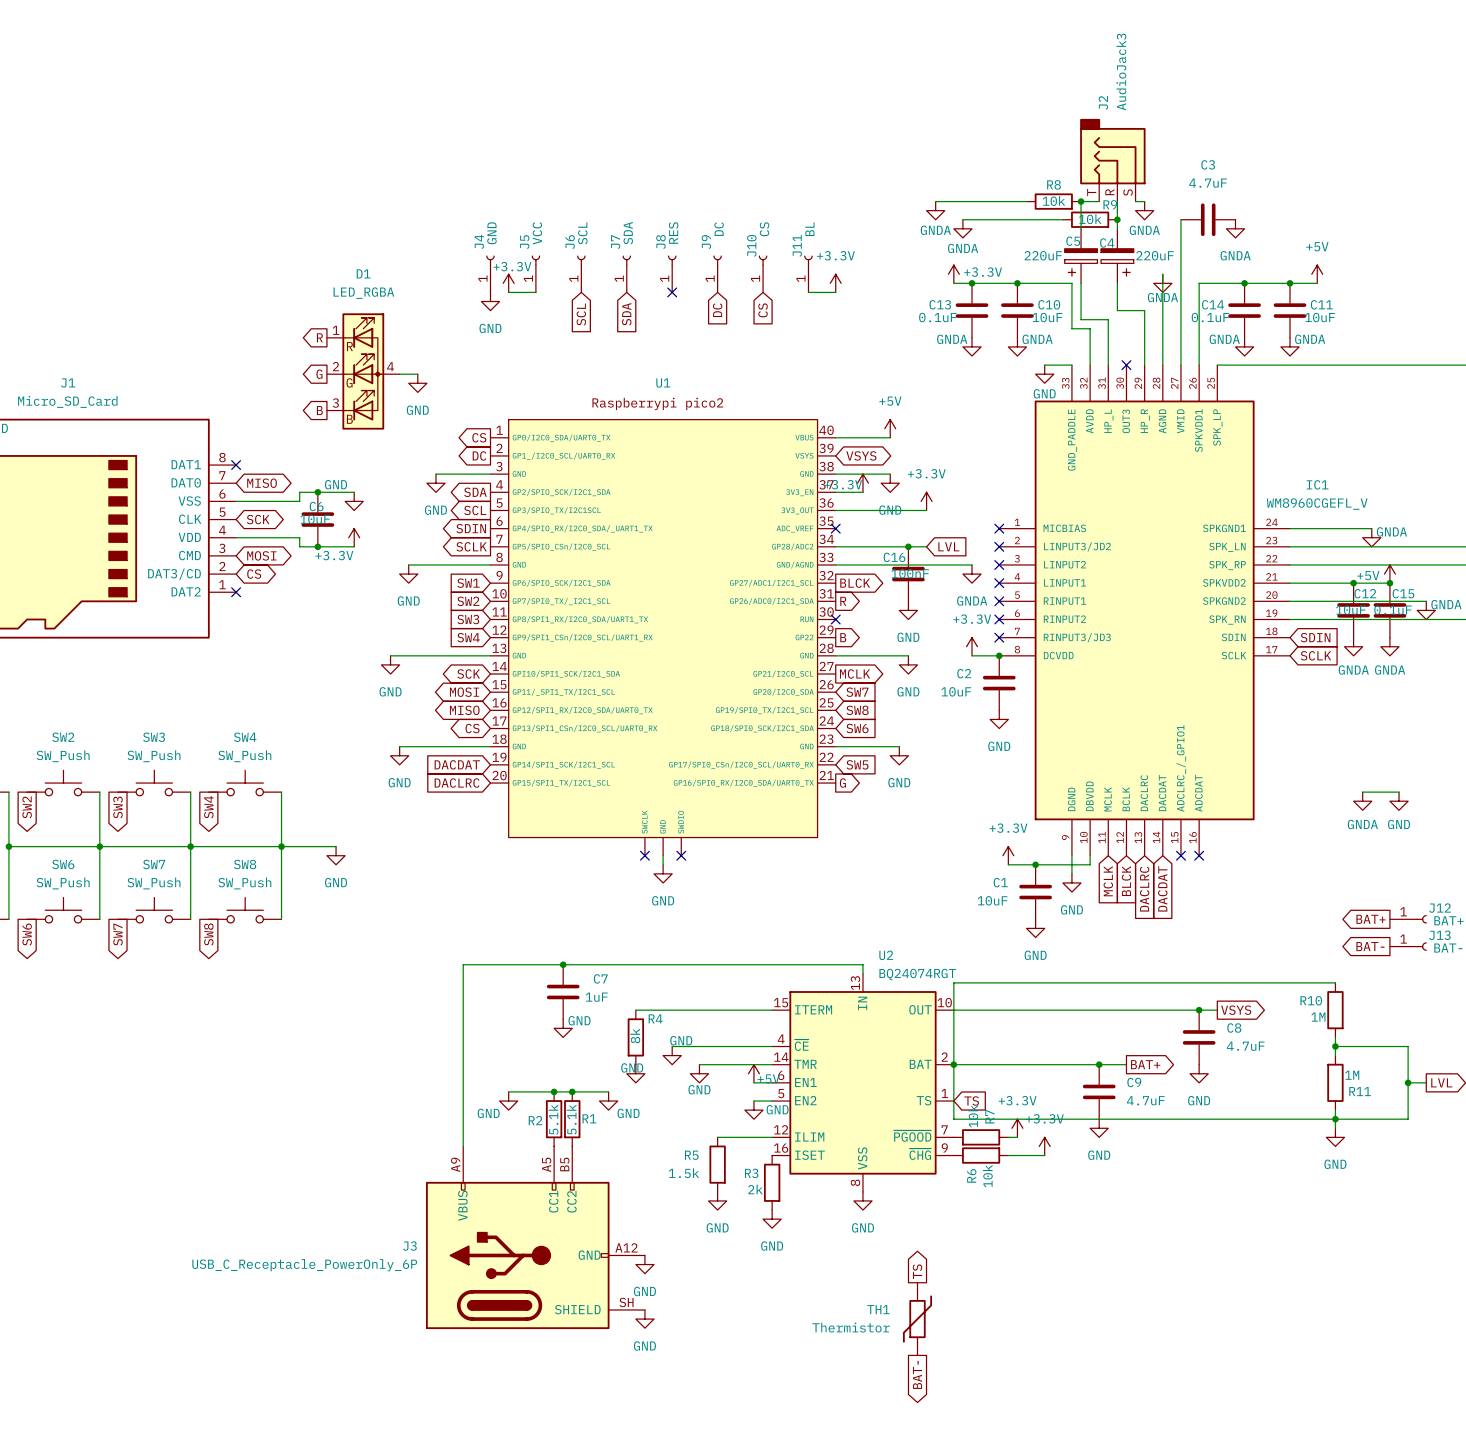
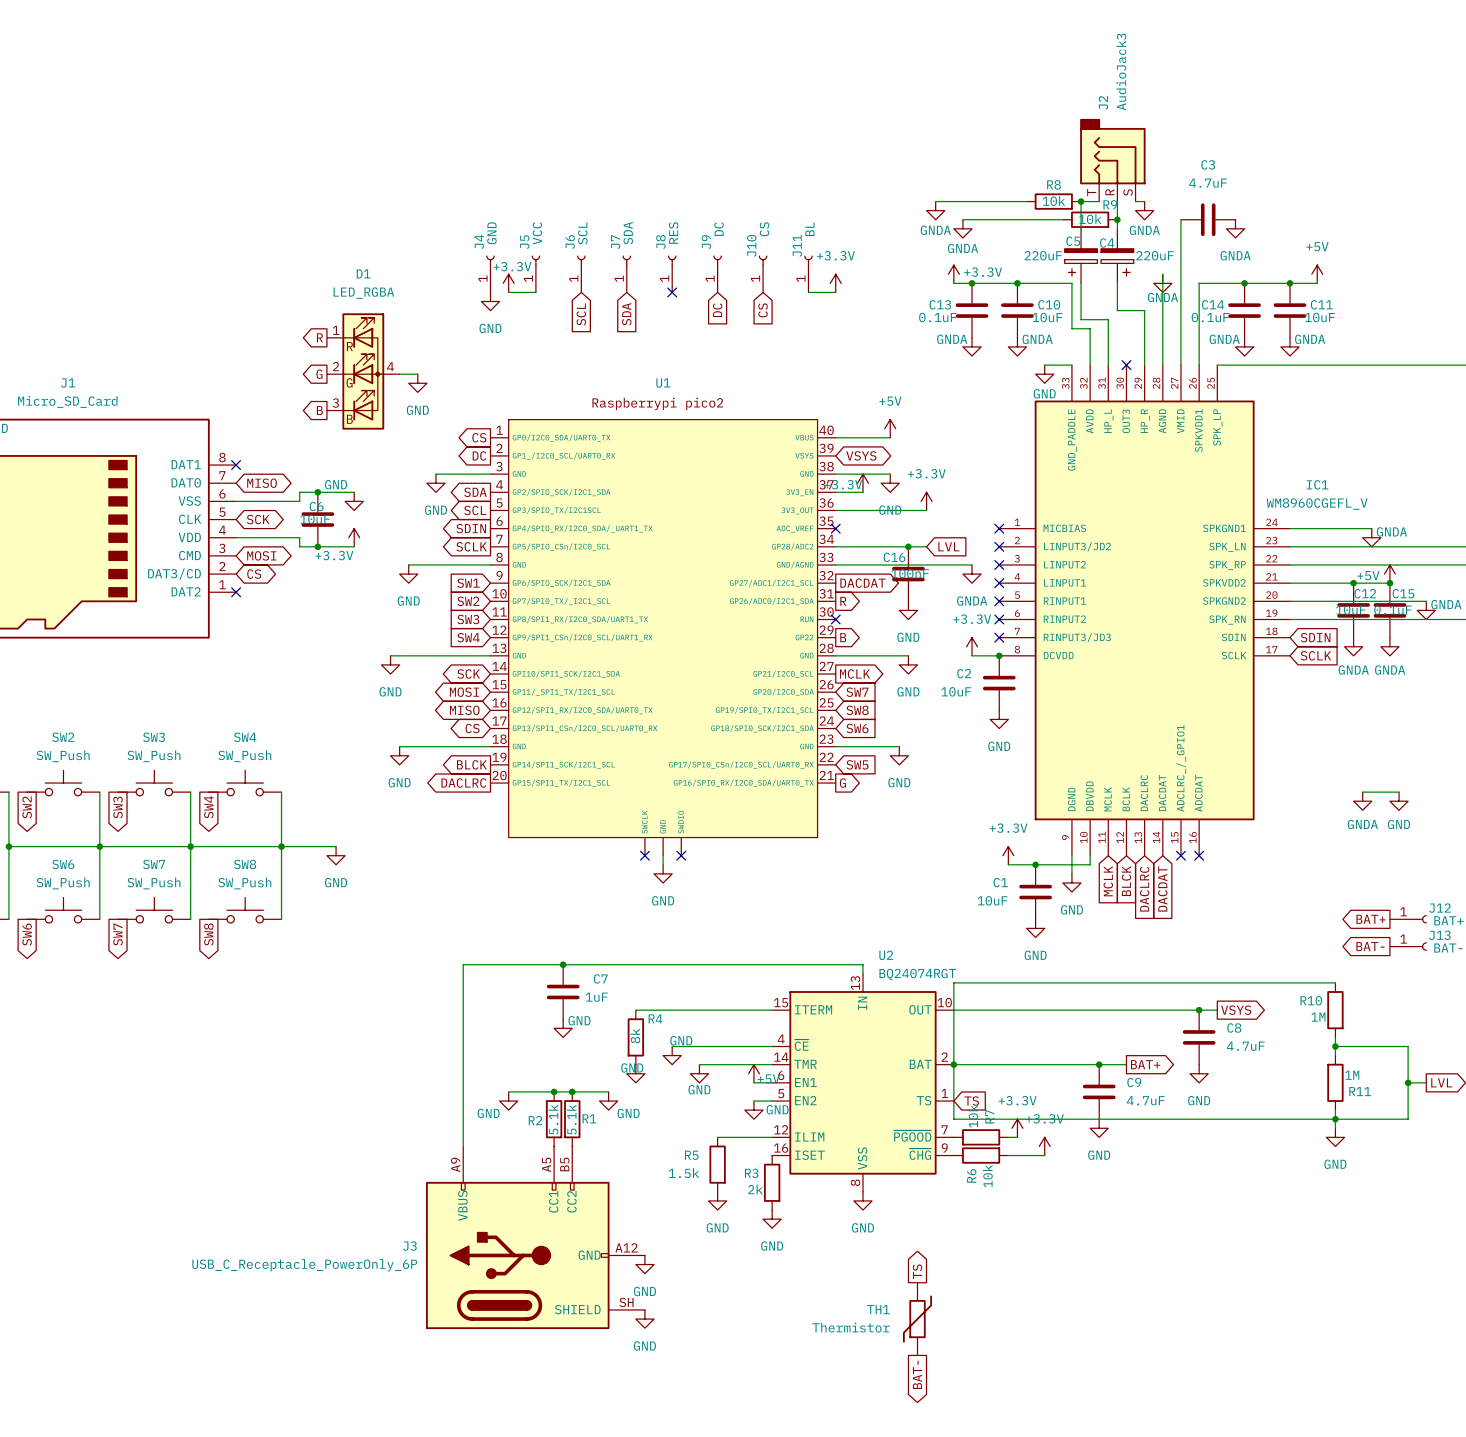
global label: BLCK (855, 583) -> DACDAT (863, 583)
global label shape: input (457, 764) -> output (471, 764)
global label: DACDAT (457, 764) -> BLCK (471, 764)
global label shape: input (457, 783) -> output (463, 783)

